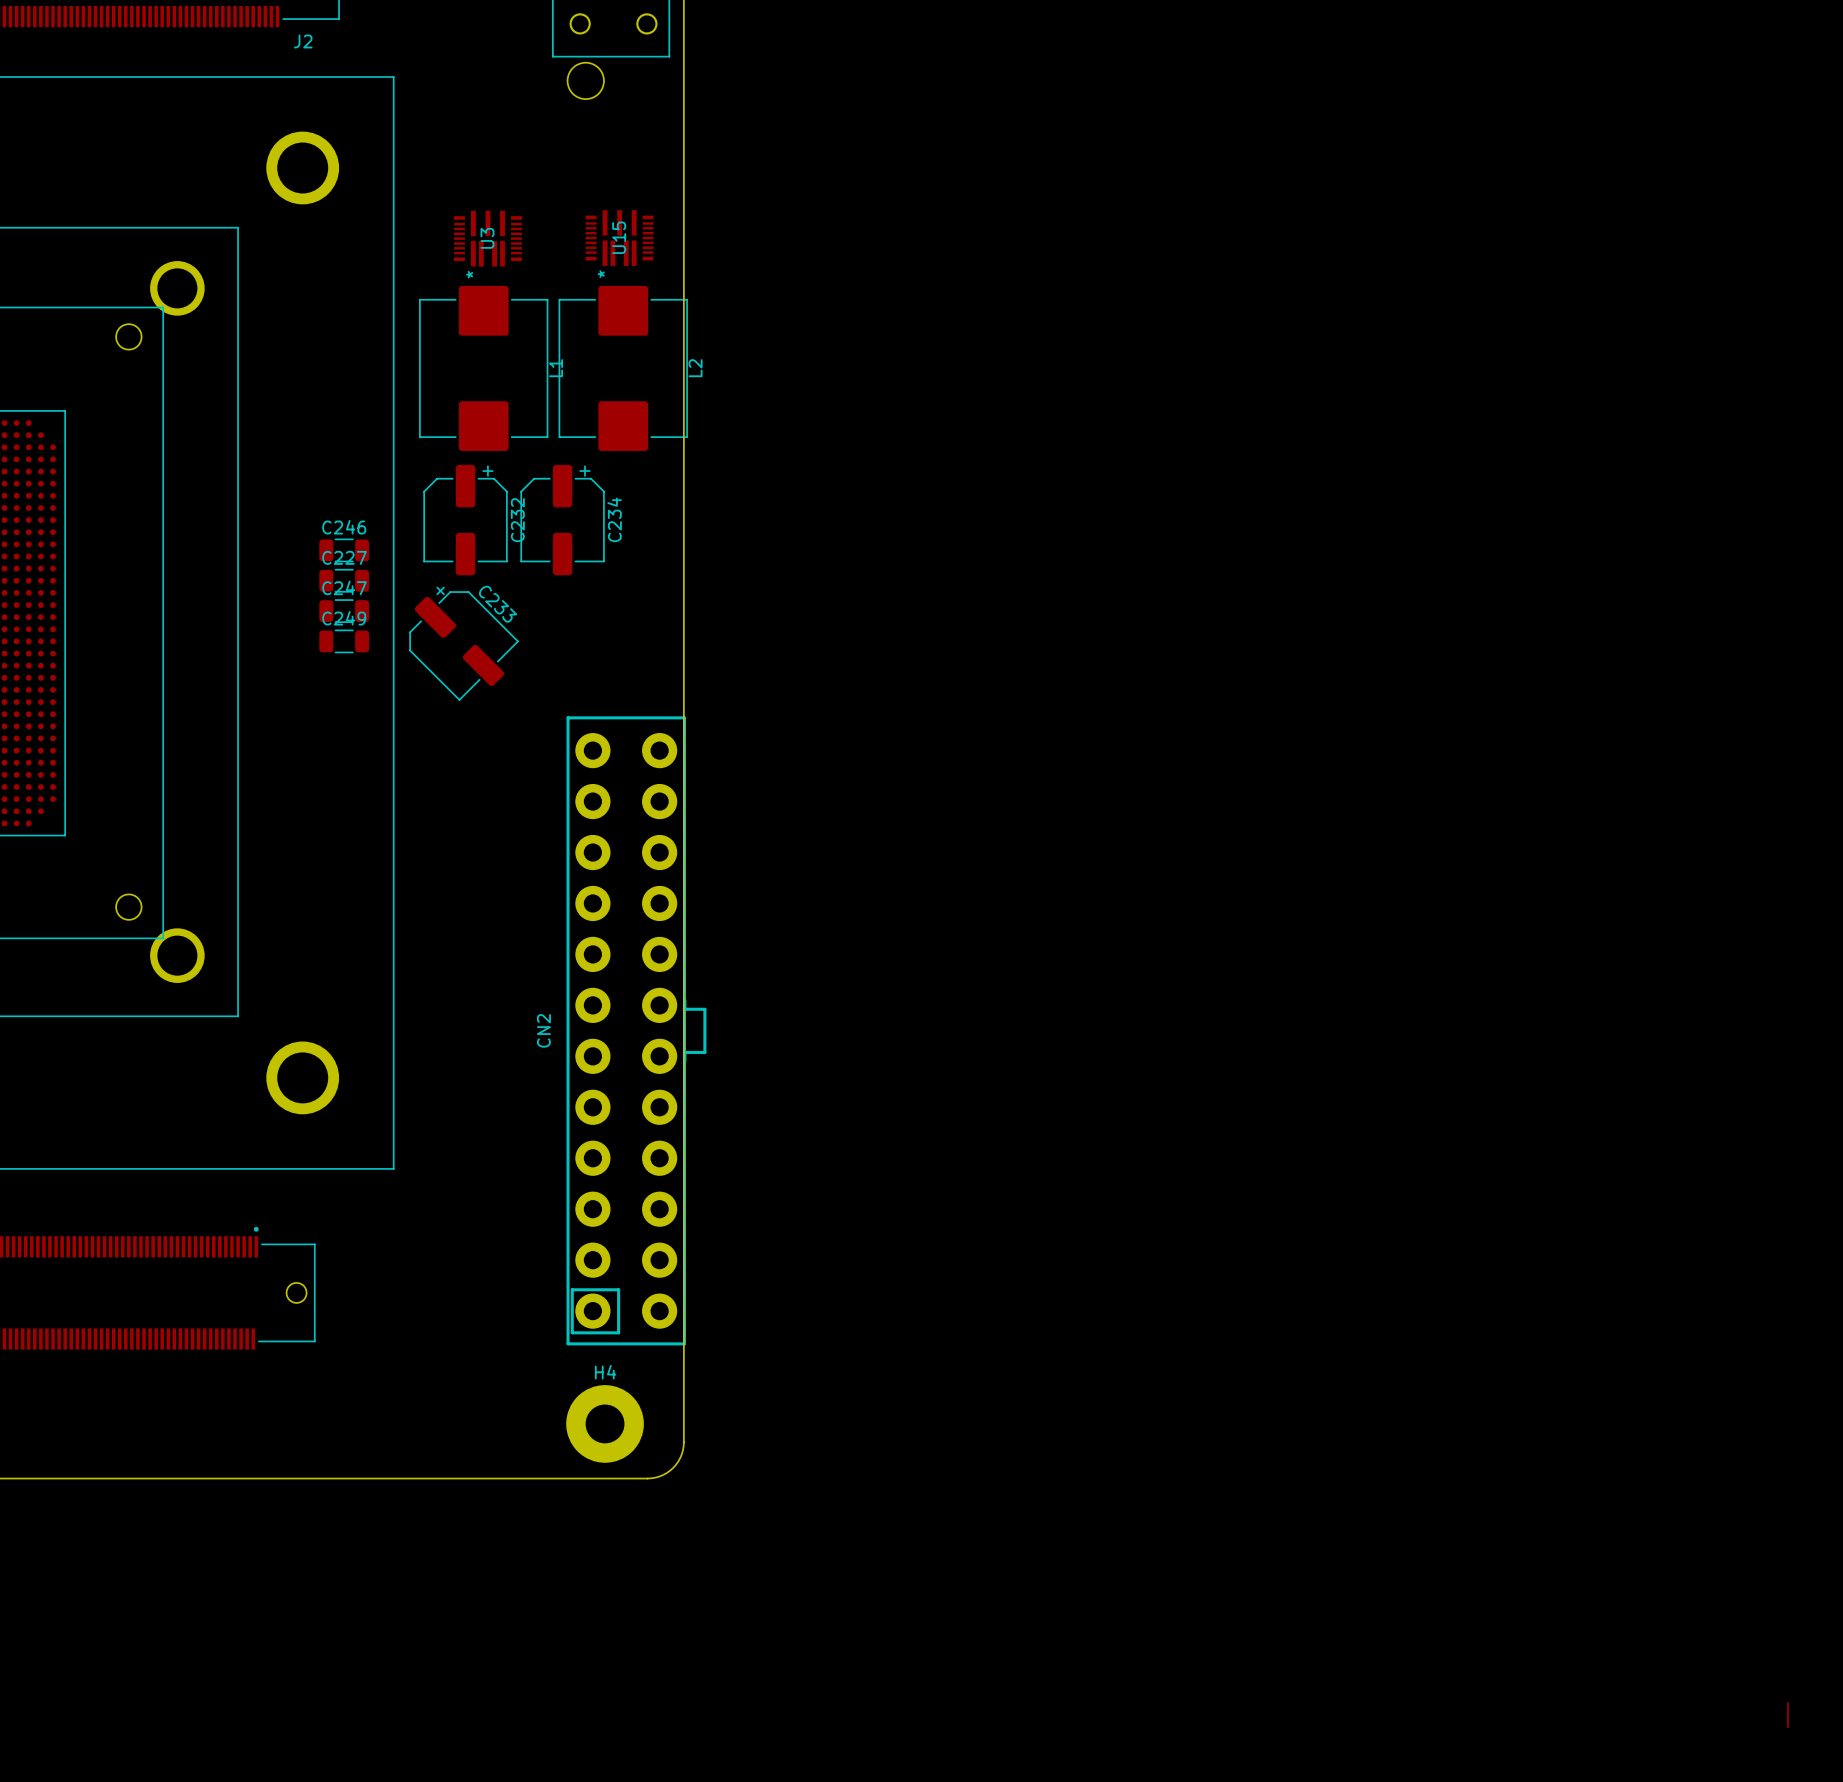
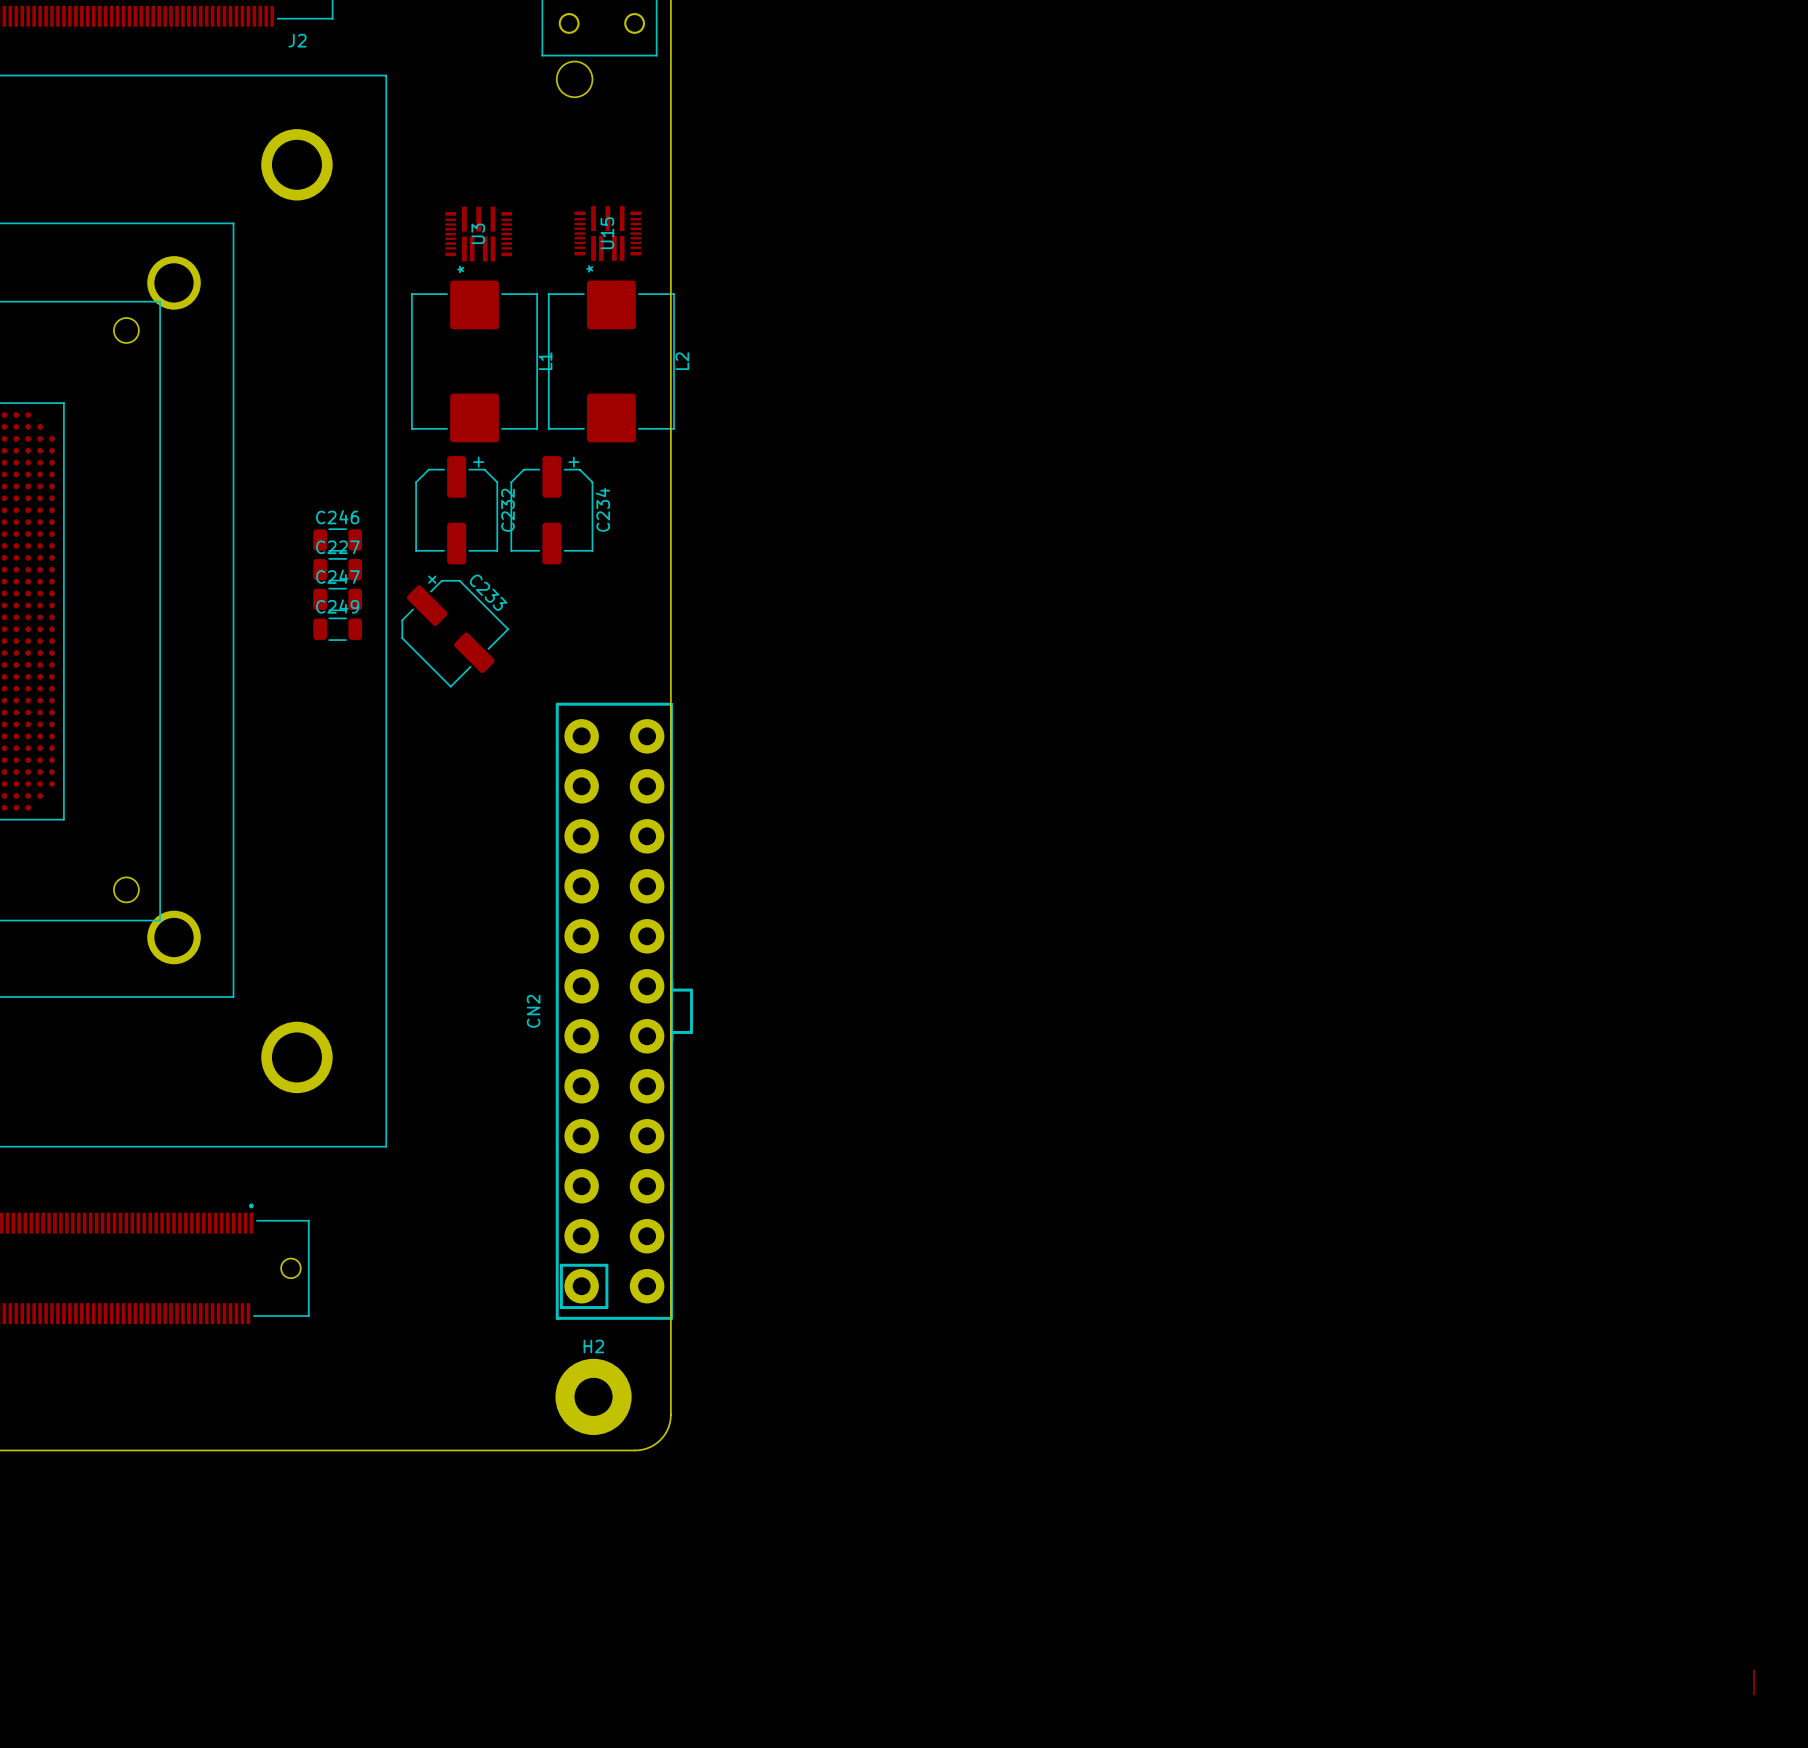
H4 name: H4 (605, 1372) -> H2 (593, 1346)

